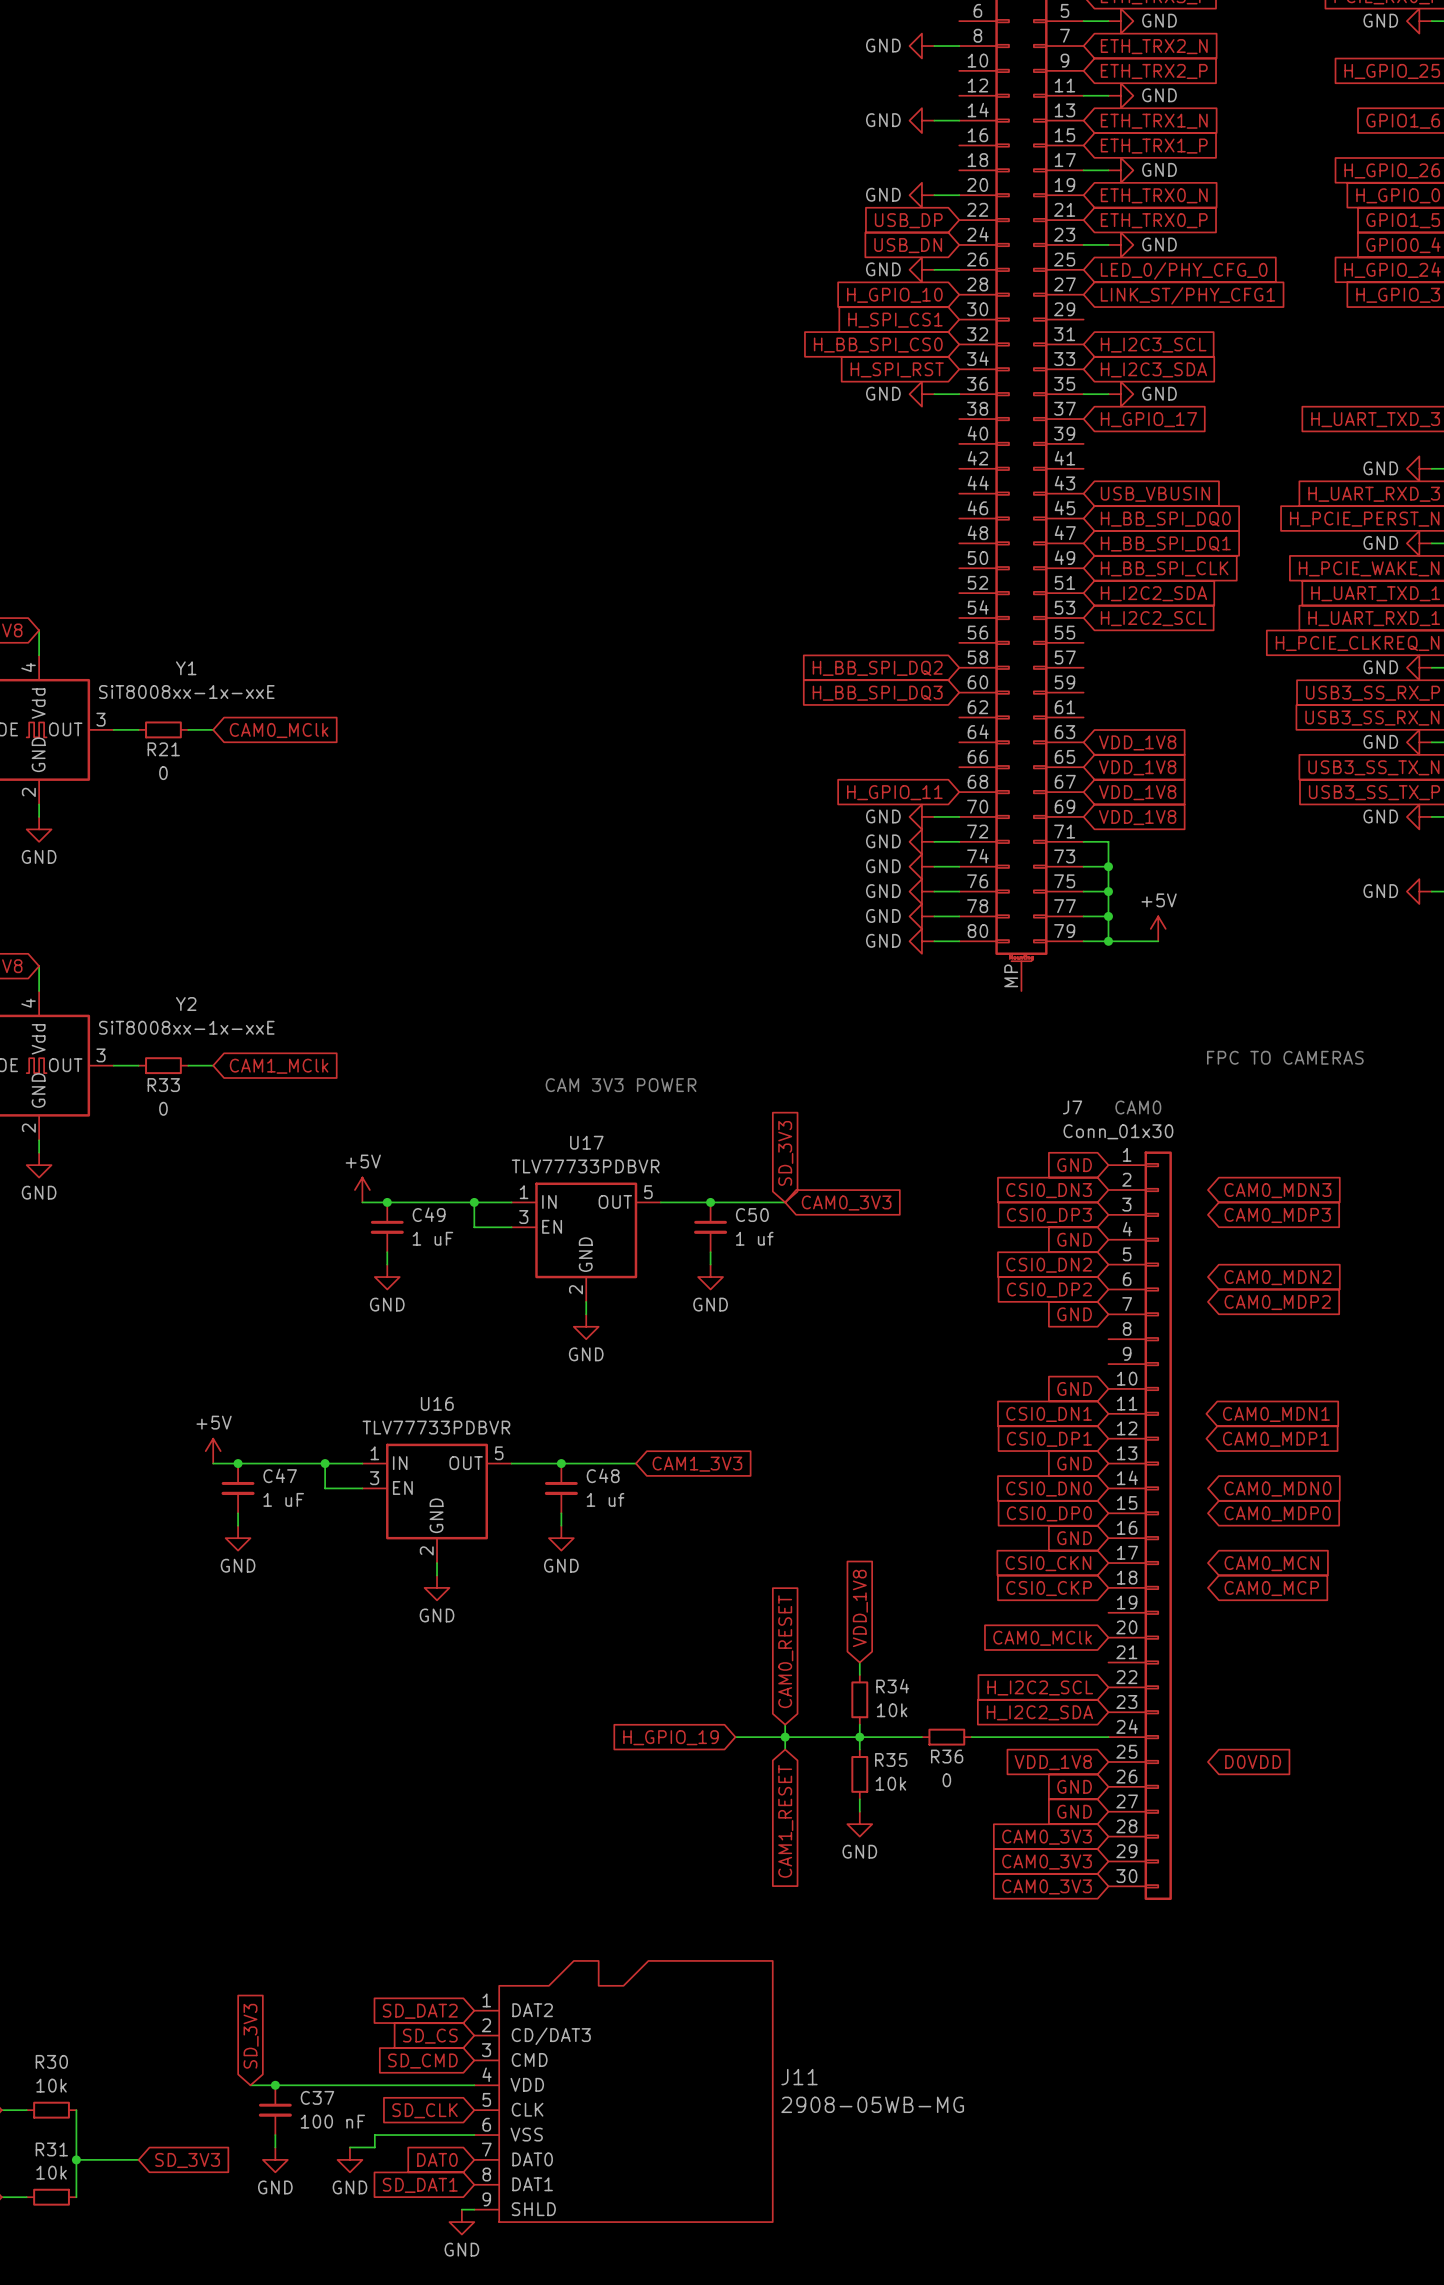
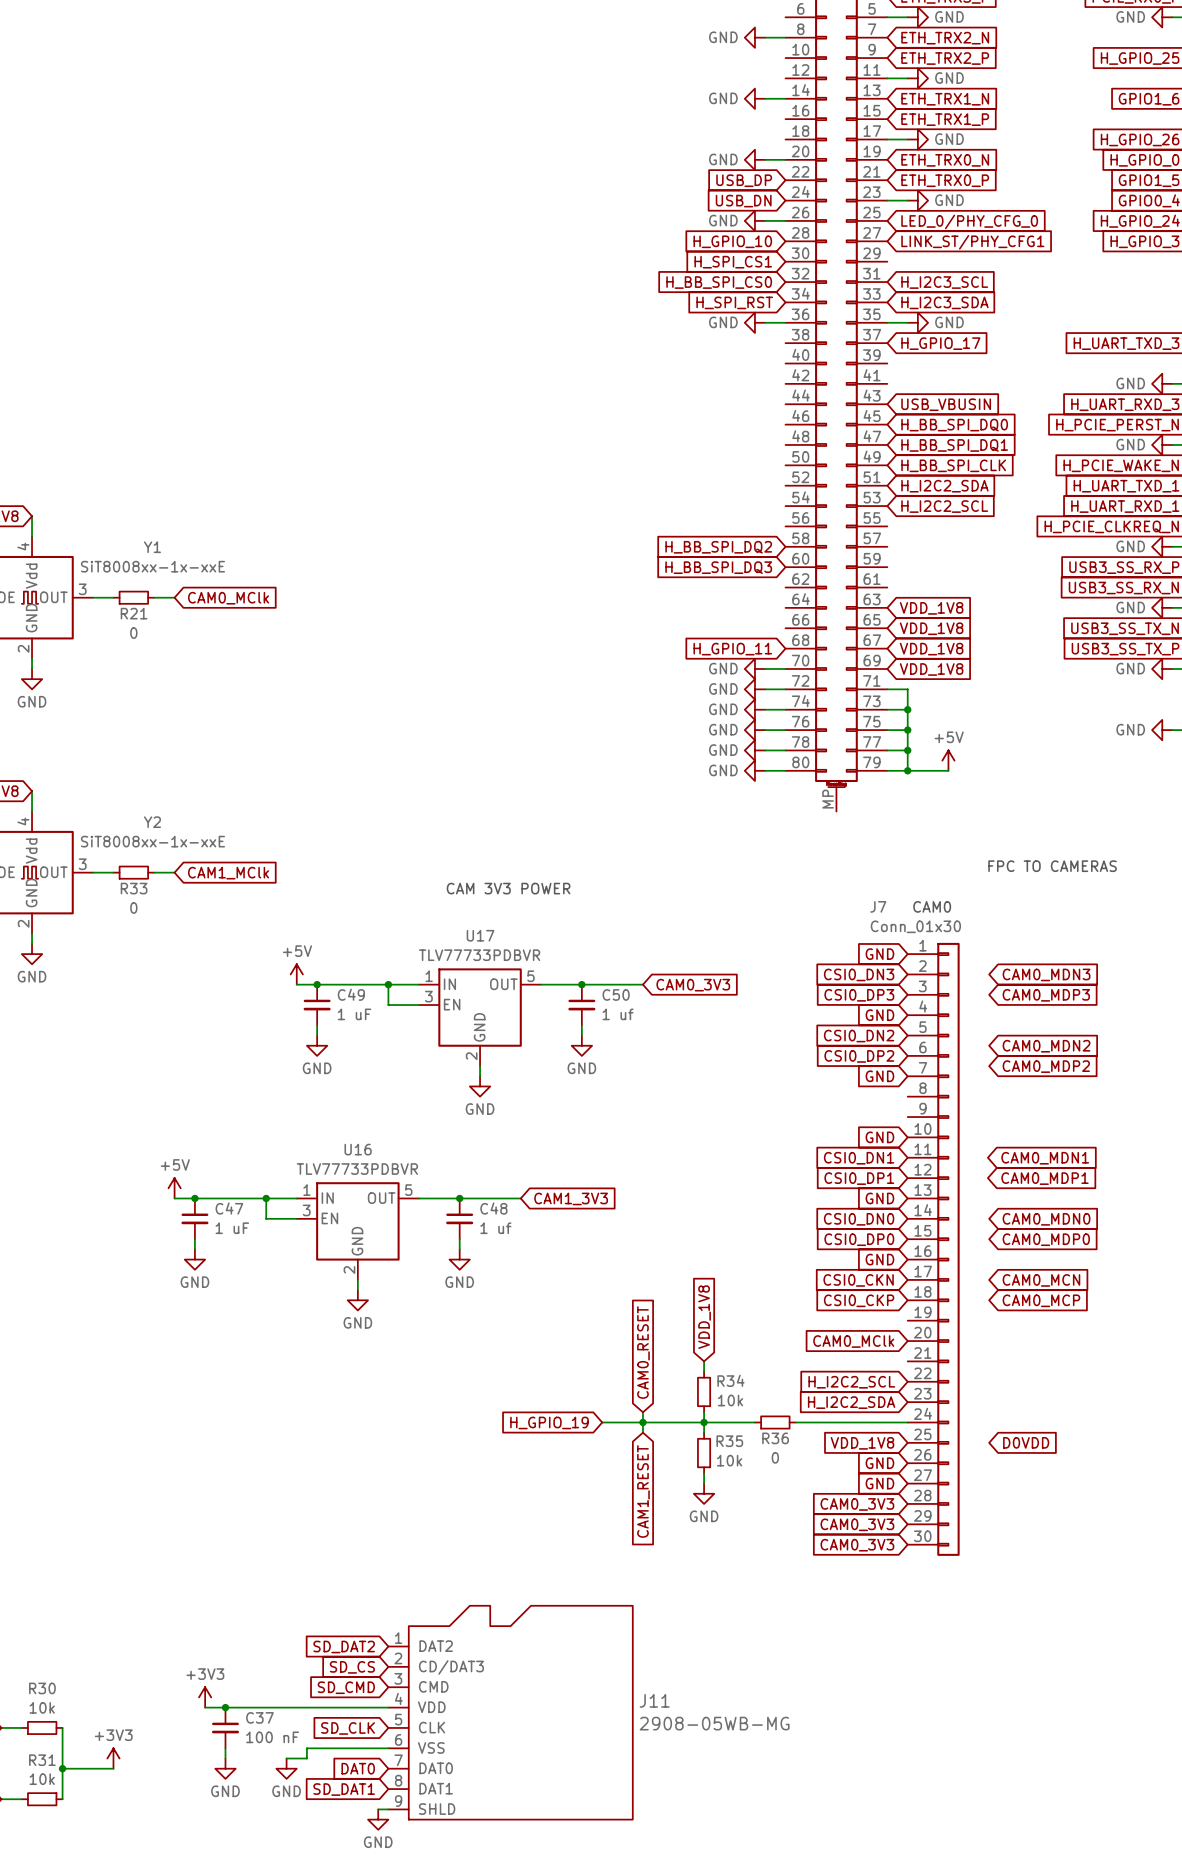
global label: SD_3V3 (785, 1153) -> none
global label: SD_3V3 (251, 2036) -> none
power symbol: none -> +3V3 (205, 1697)
power symbol: none -> +3V3 (113, 1758)
global label: SD_3V3 (187, 2160) -> none

